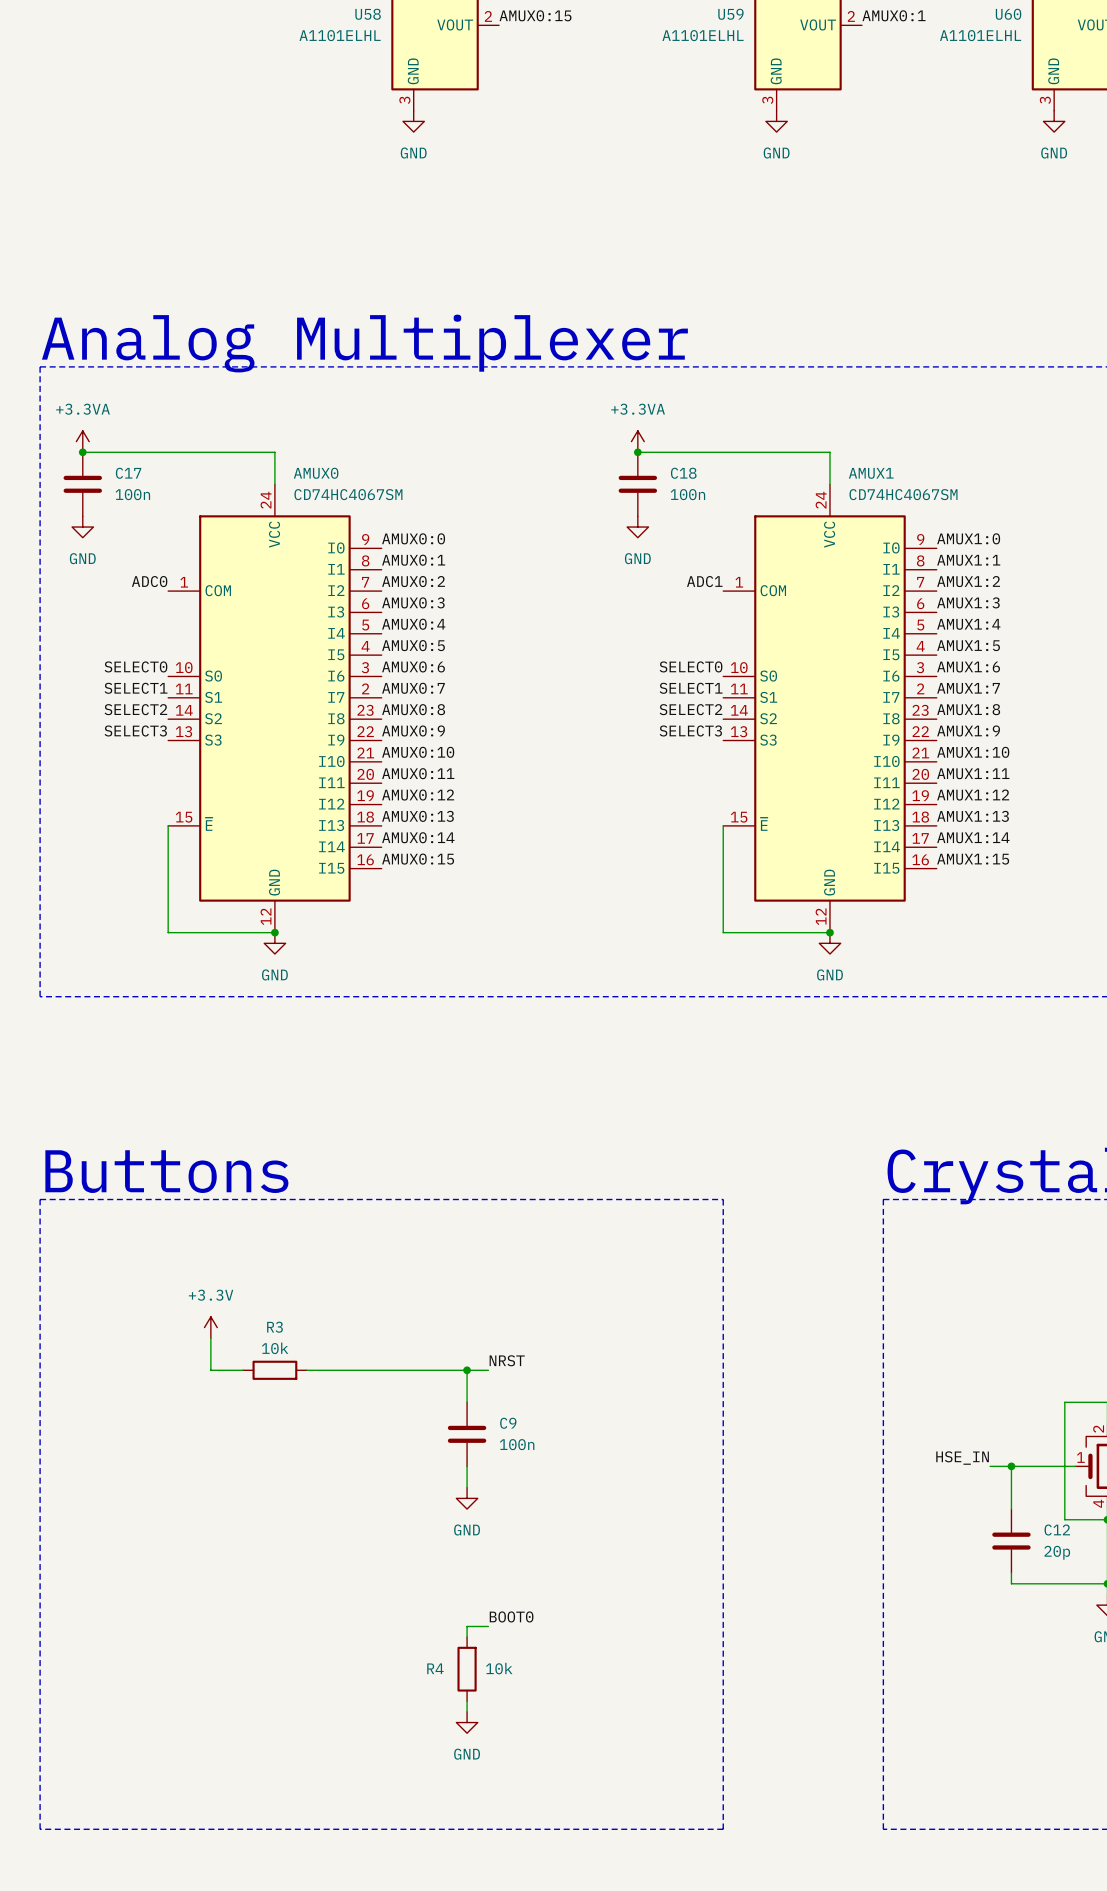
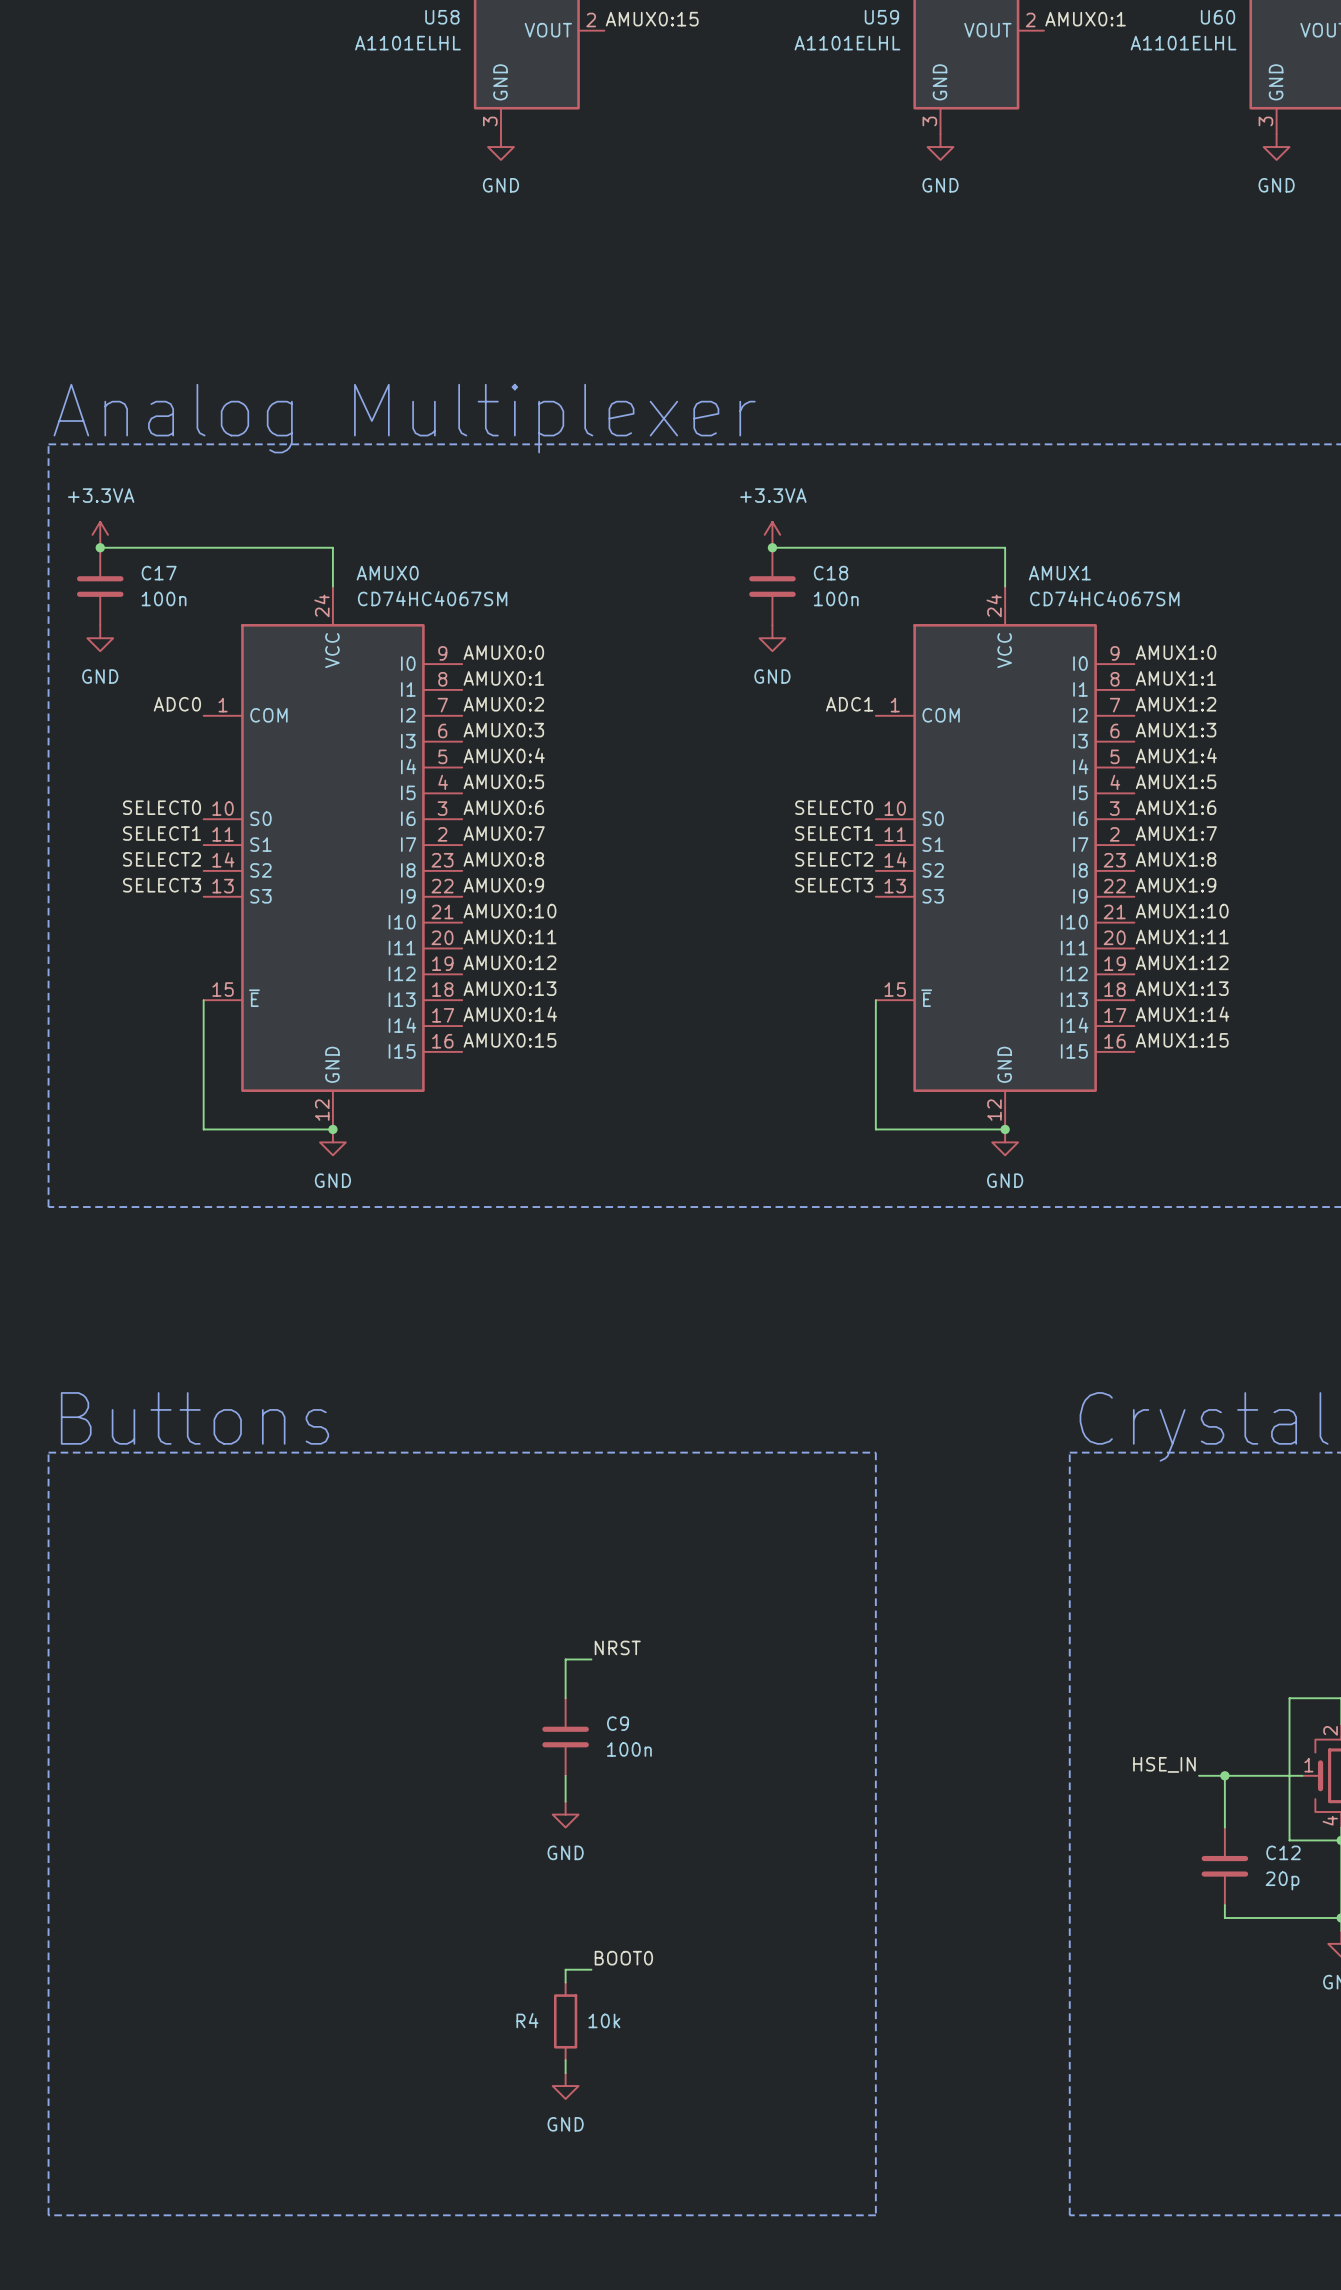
power symbol: +3.3V (210, 1327) -> none
wire: (210, 1338) (210, 1370) (242, 1370) -> none
R3: 10k (274, 1370) -> none
wire: (306, 1370) (467, 1370) -> none
junction: (467, 1370) -> none

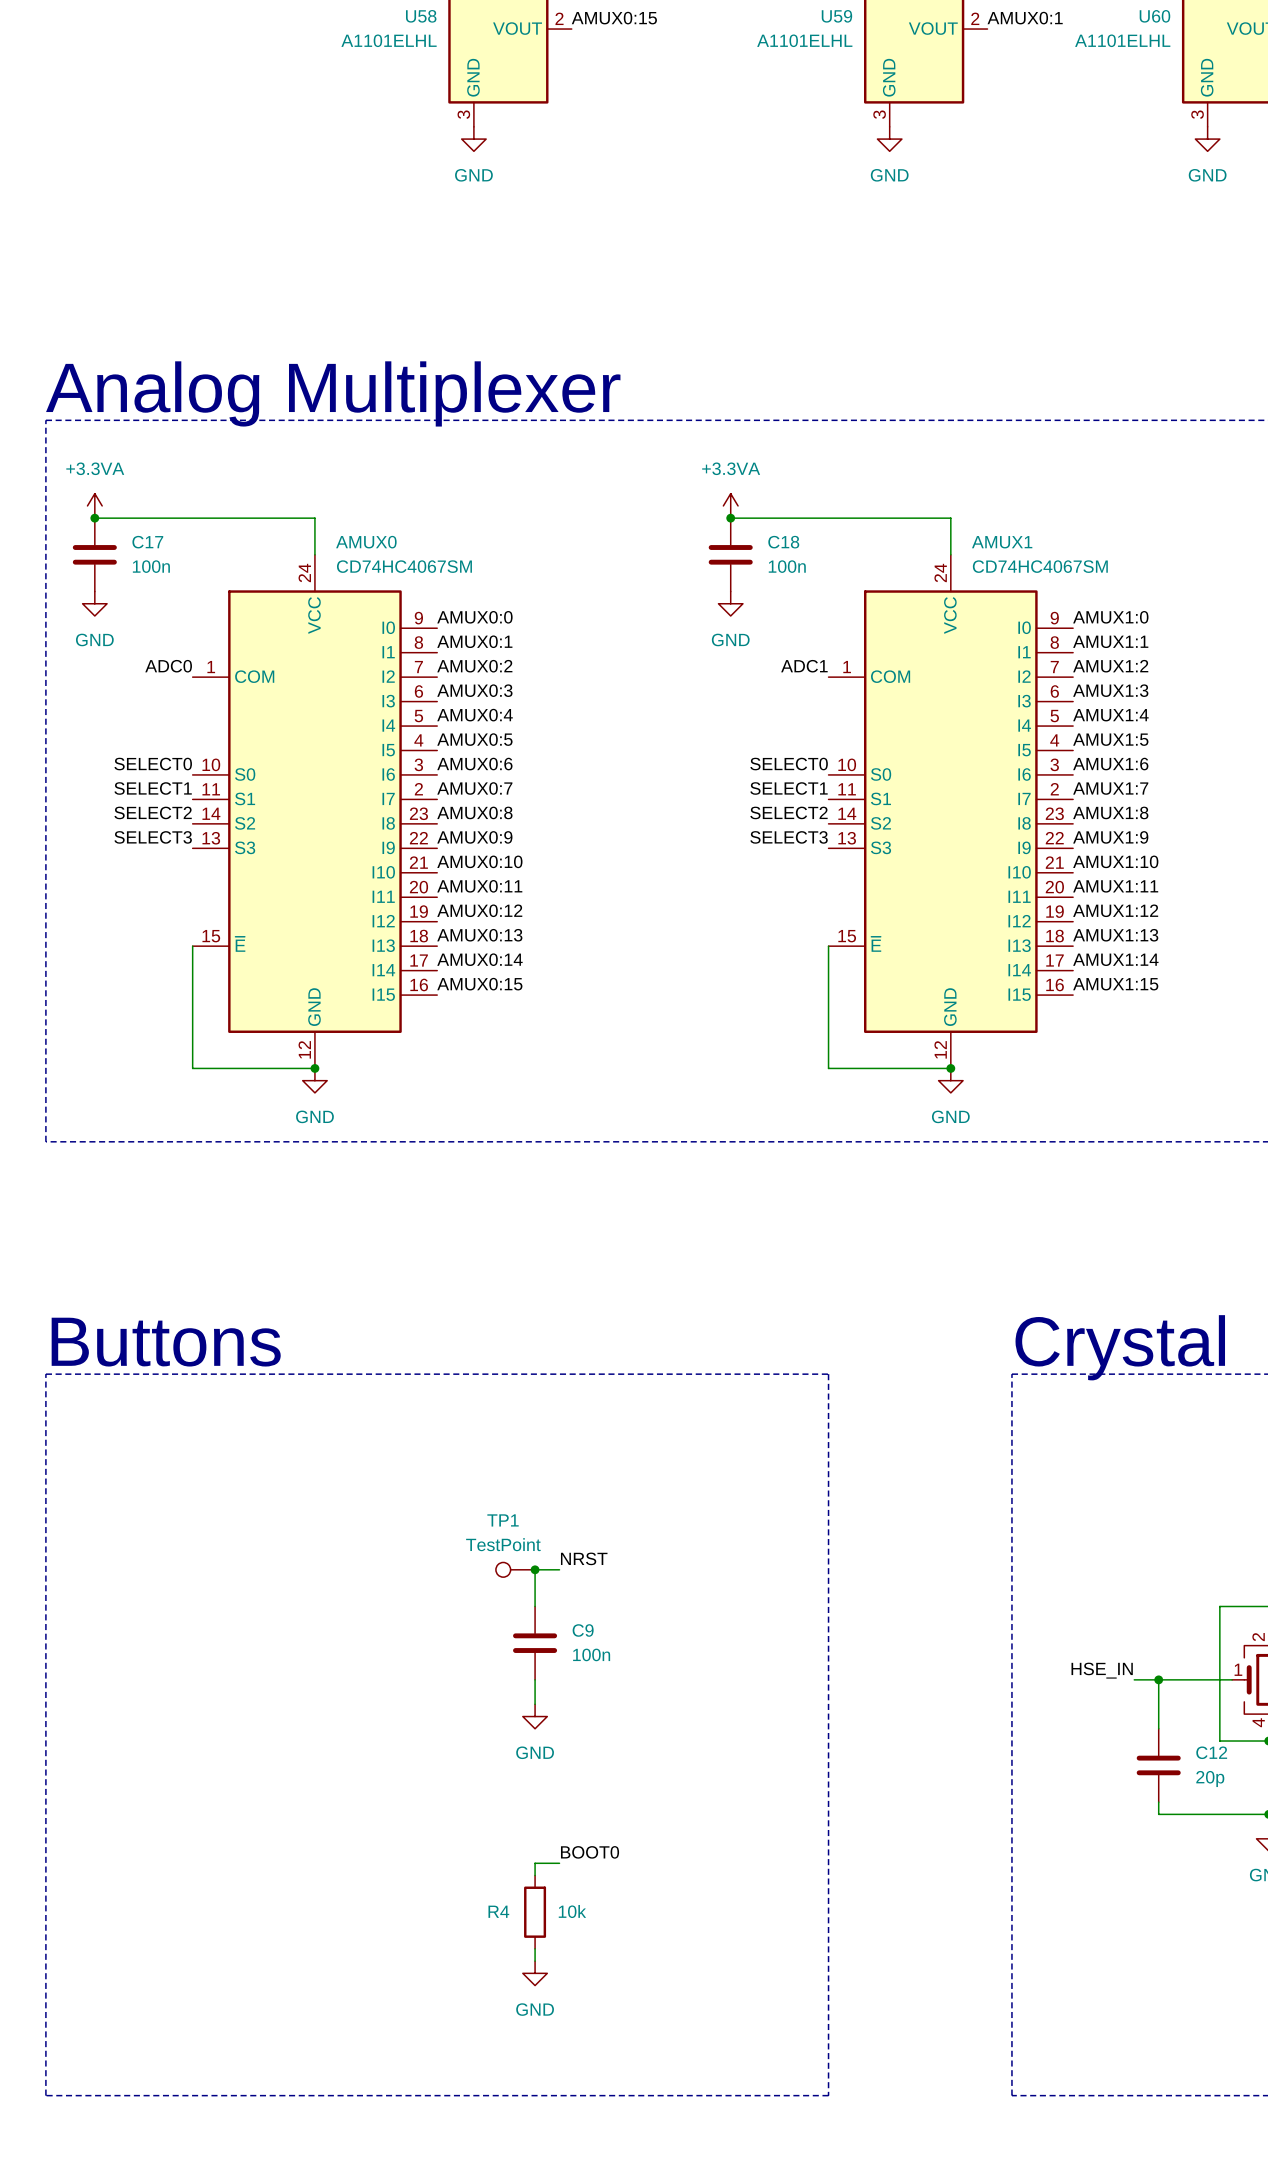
TP1: none -> TestPoint (515, 1569)
junction: none -> (535, 1569)

